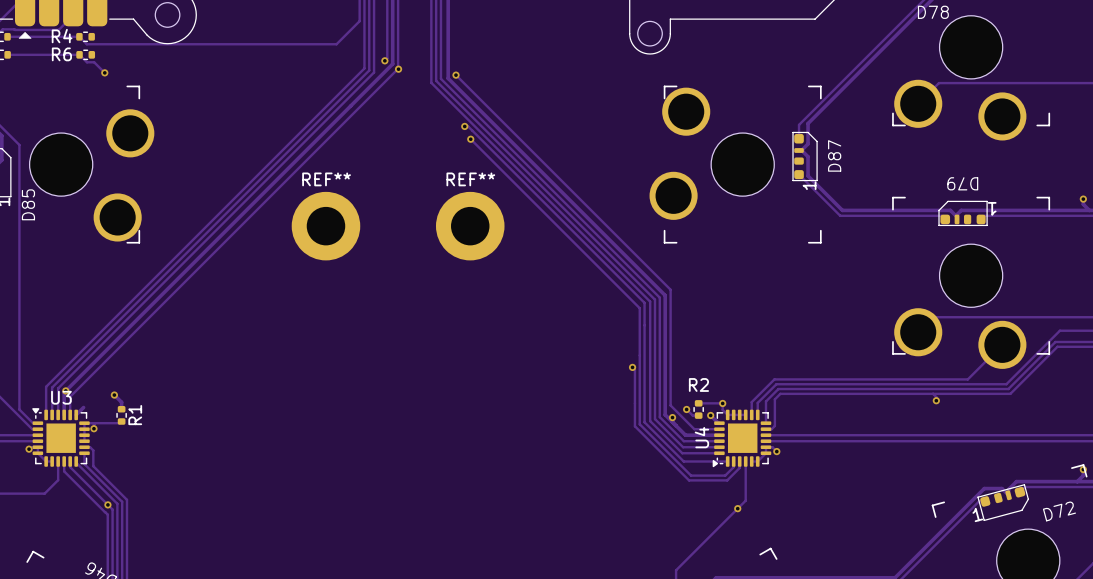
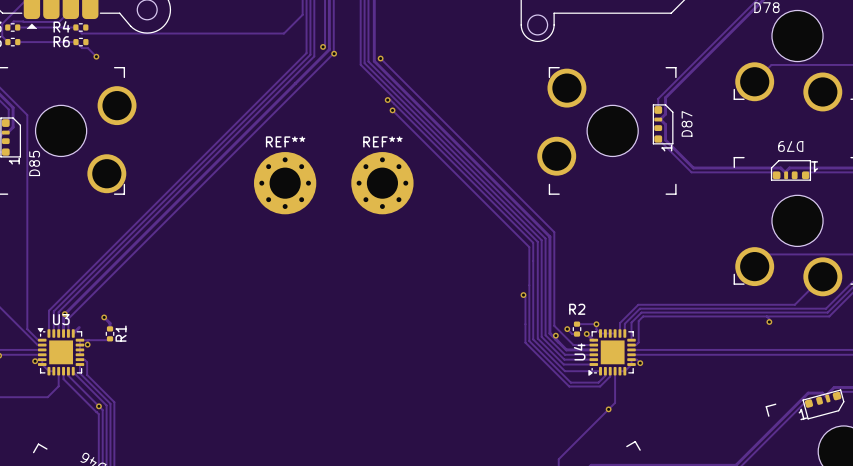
REF**: (325, 226) -> none
REF**: (470, 226) -> none
REF**: none -> (285, 183)
REF**: none -> (382, 183)

